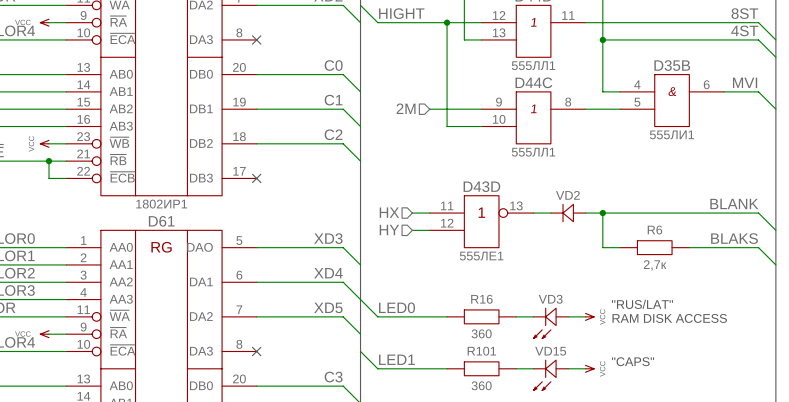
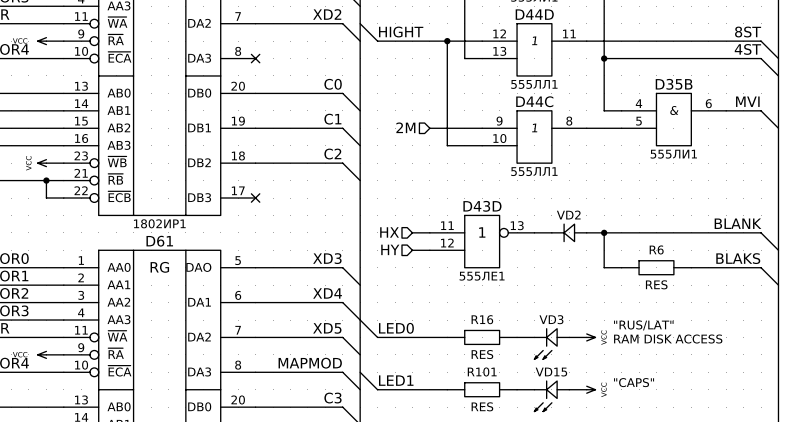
R6 value: 2,7к (655, 265) -> RES (656, 284)
R16 value: 360 (481, 333) -> RES (482, 354)
label: none -> MAPMOD (310, 363)
wire: none -> (255, 372) (342, 372) (360, 389)
no-connect mark: (256, 351) -> none
R101 value: 360 (481, 385) -> RES (482, 406)

